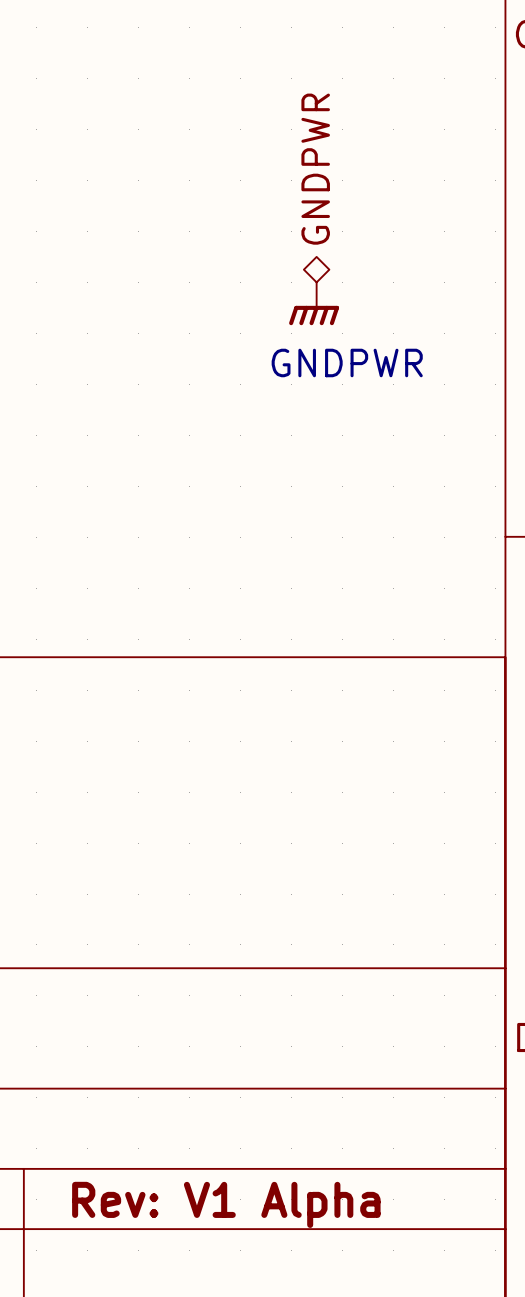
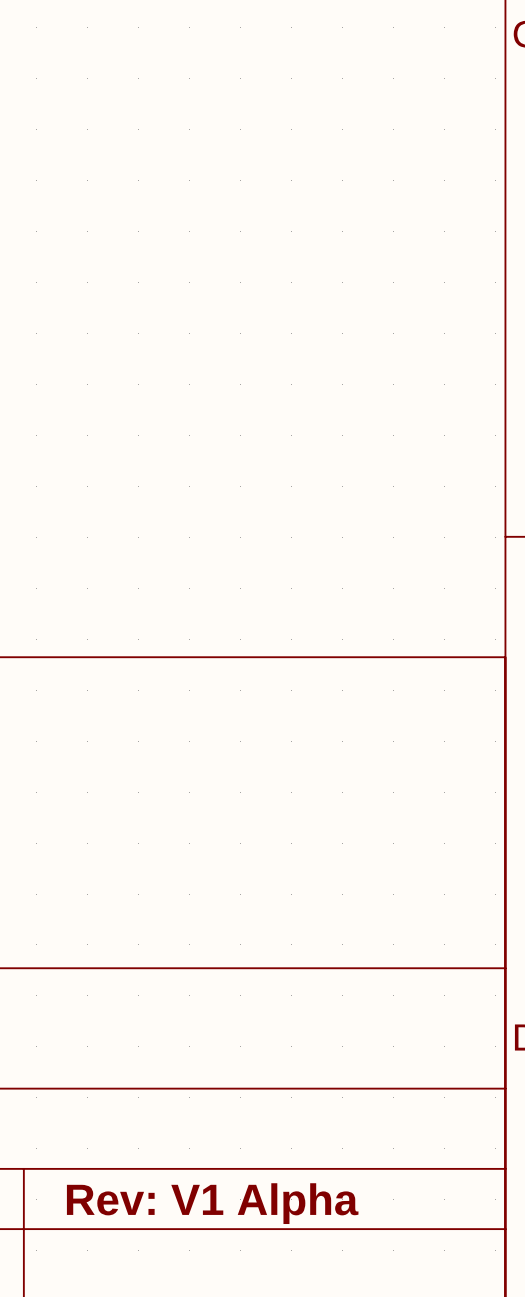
hierarchical label: GNDPWR (315, 169) -> none
power symbol: GNDPWR (314, 303) -> none

